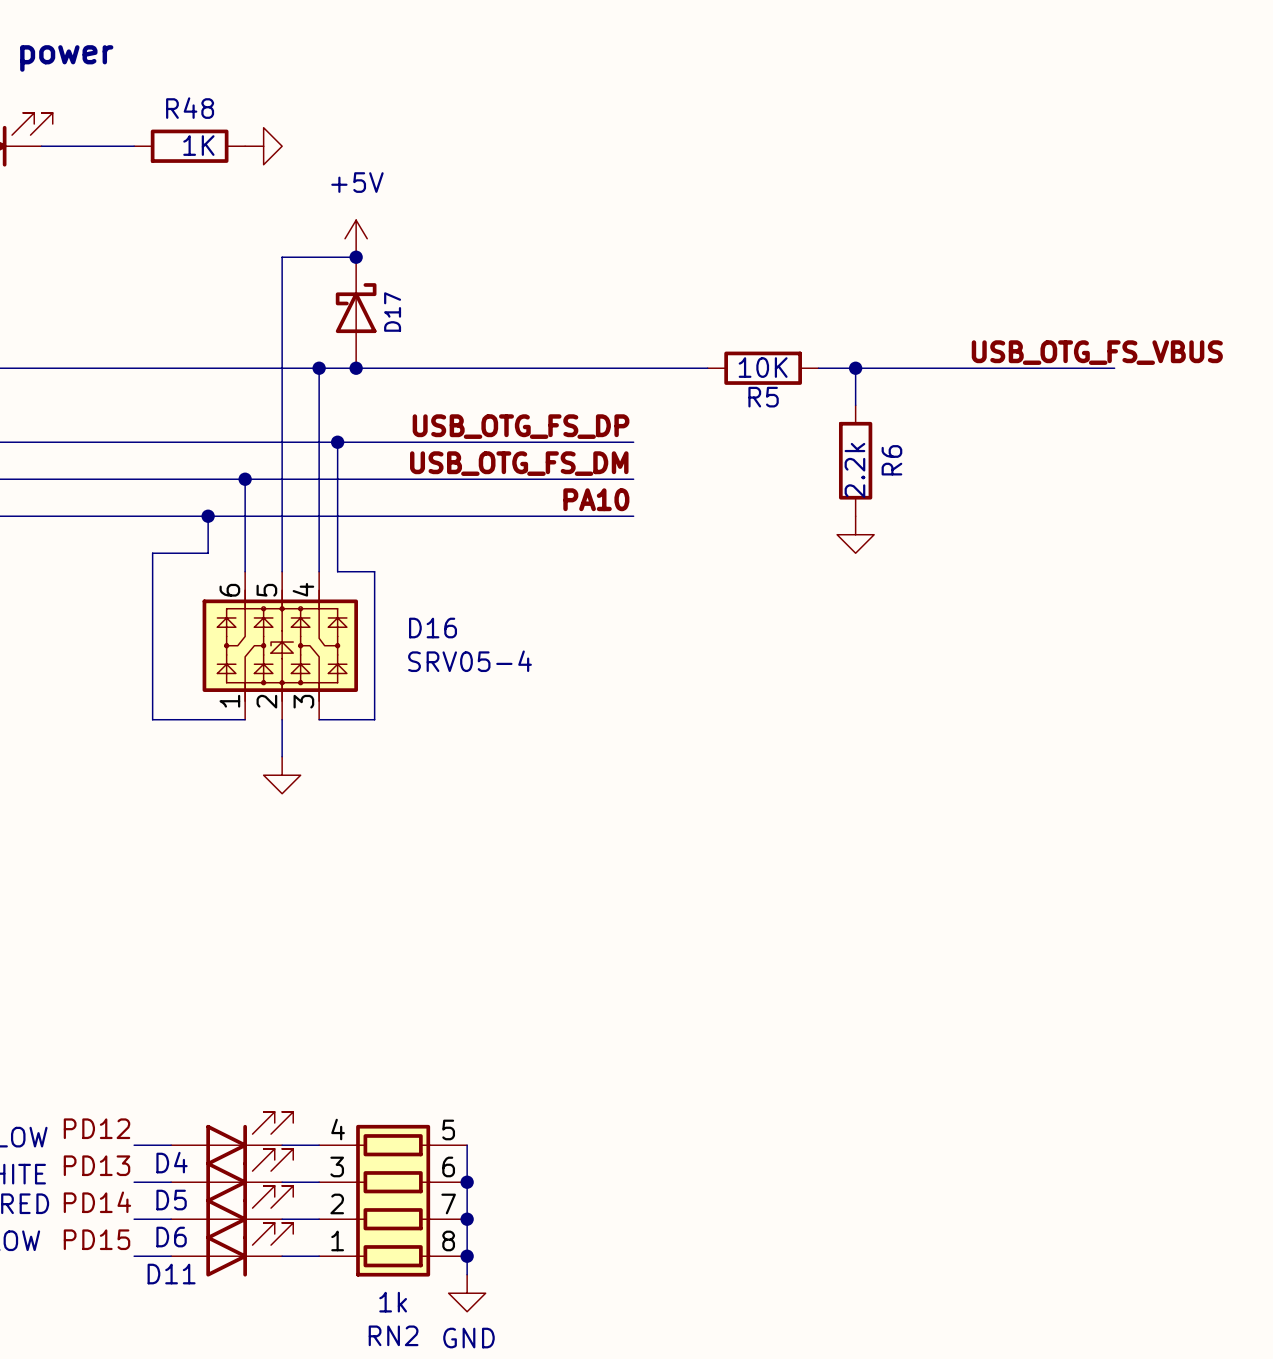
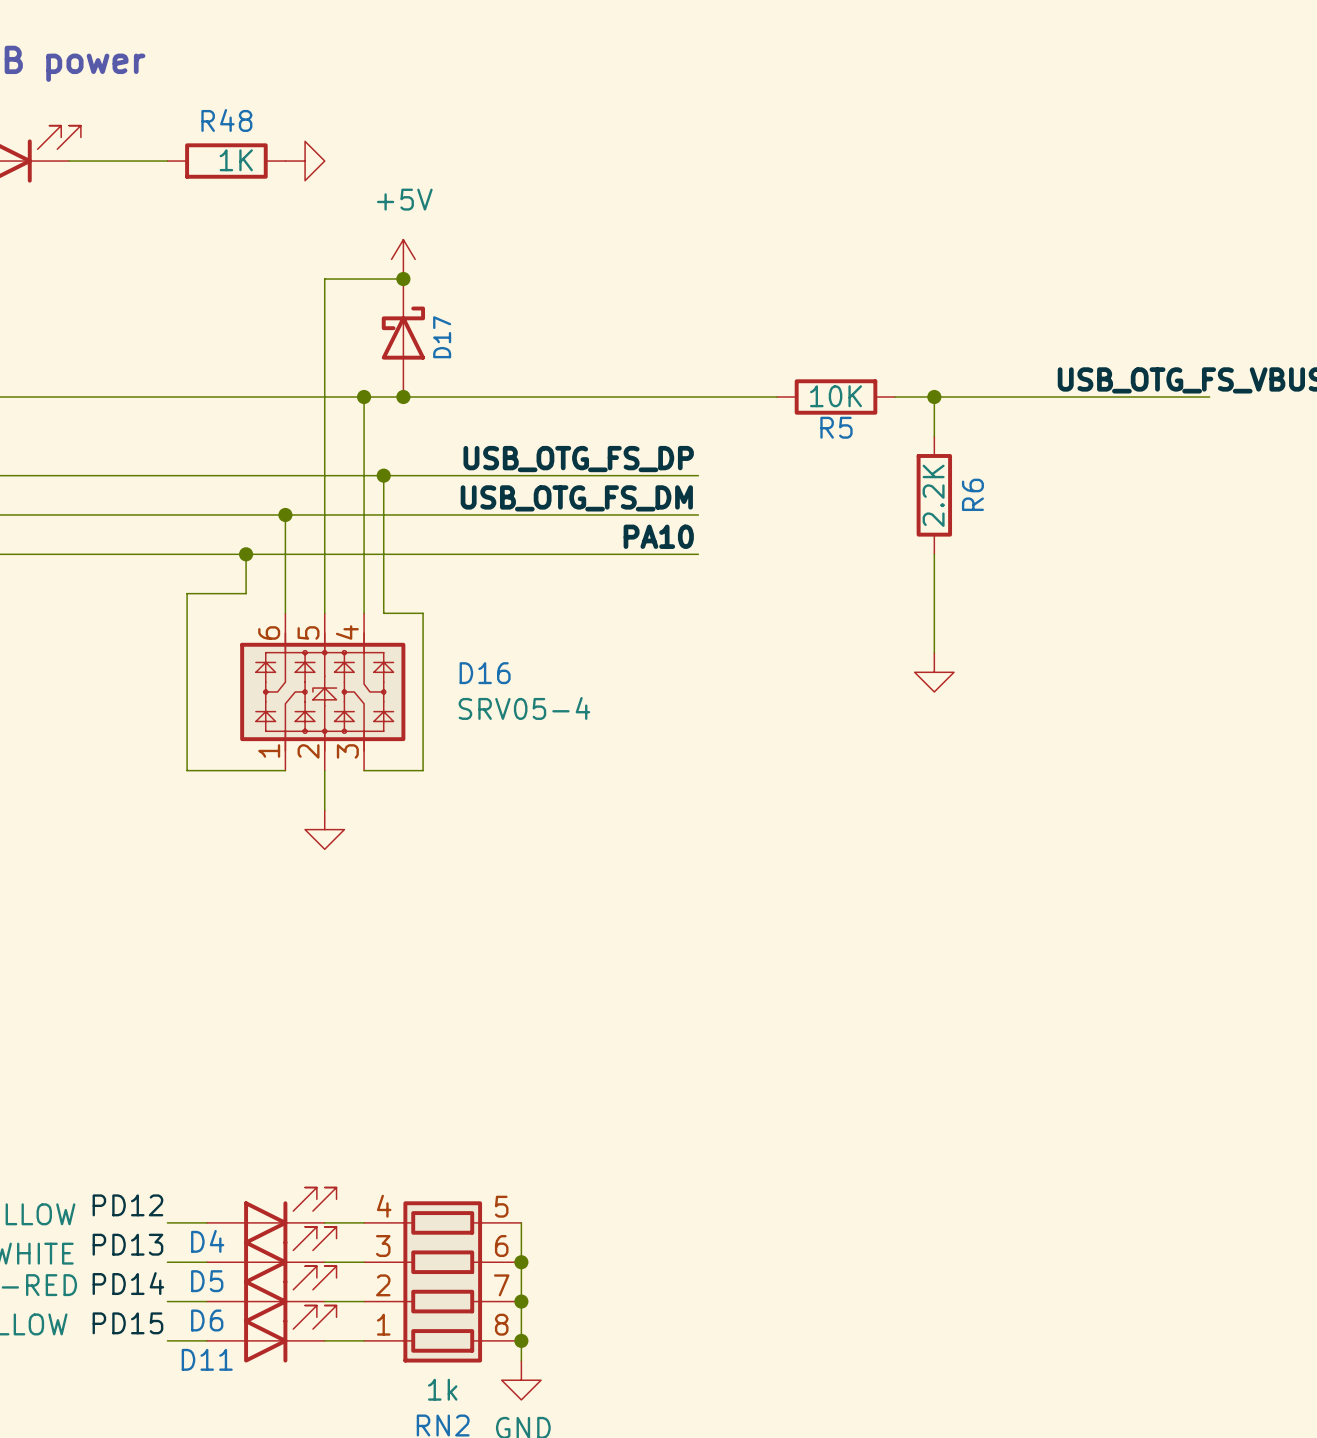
R6 value: 2.2k (854, 470) -> 2.2K (933, 495)
wire: none -> (934, 554) (934, 652)
power symbol position: (855, 534) -> (934, 672)

